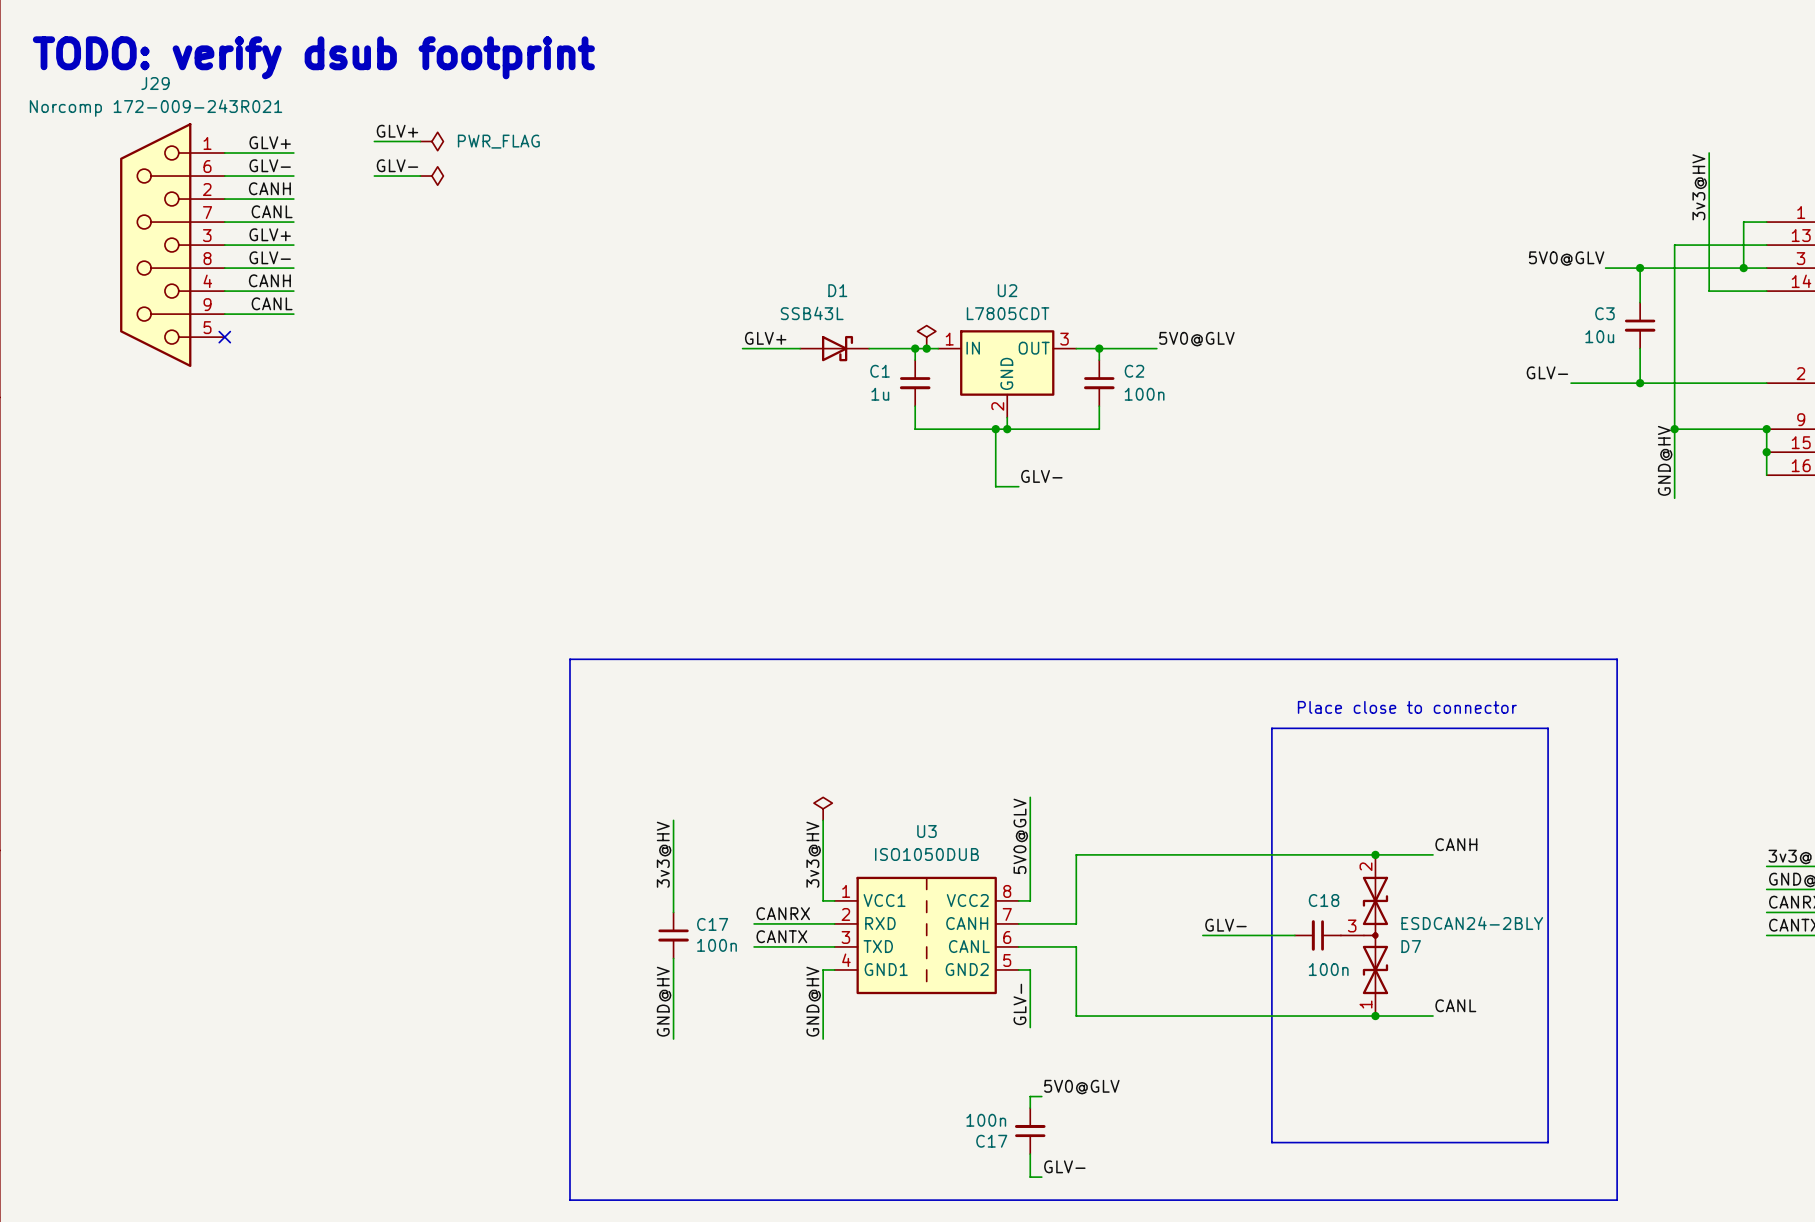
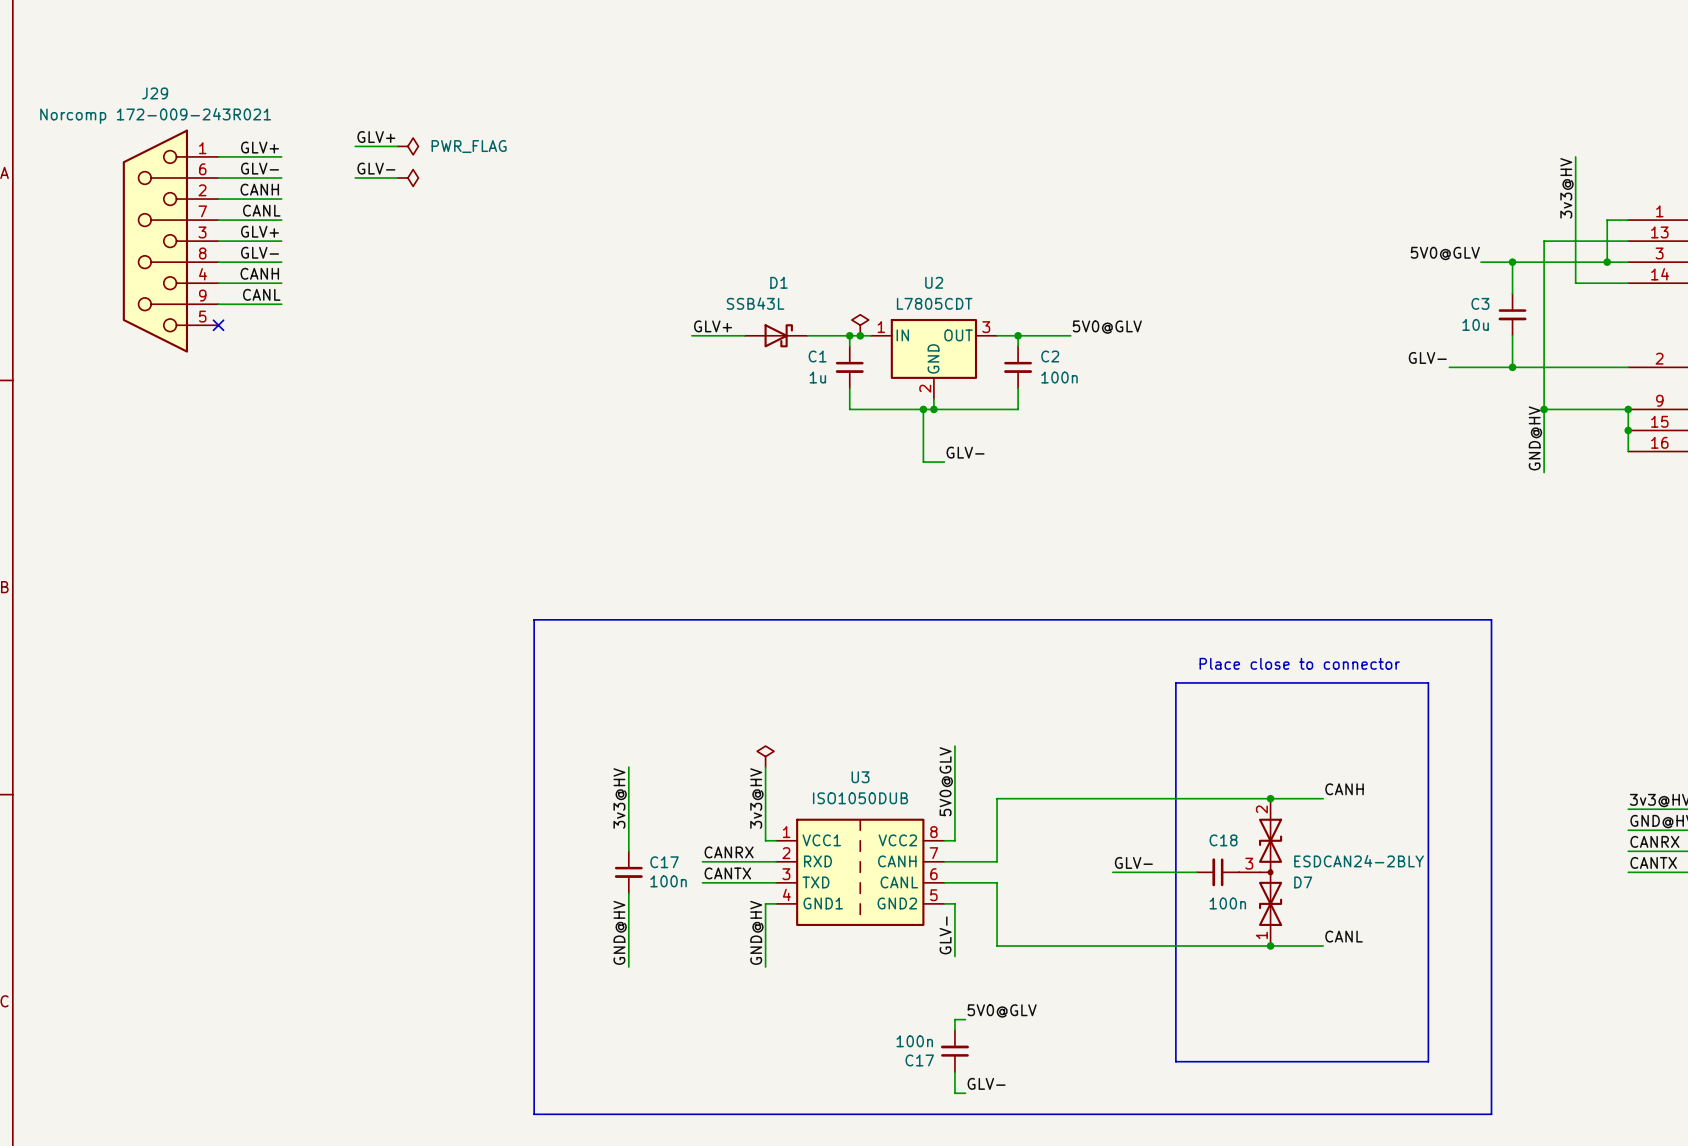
text: TODO: verify dsub footprint (313, 57) -> none

